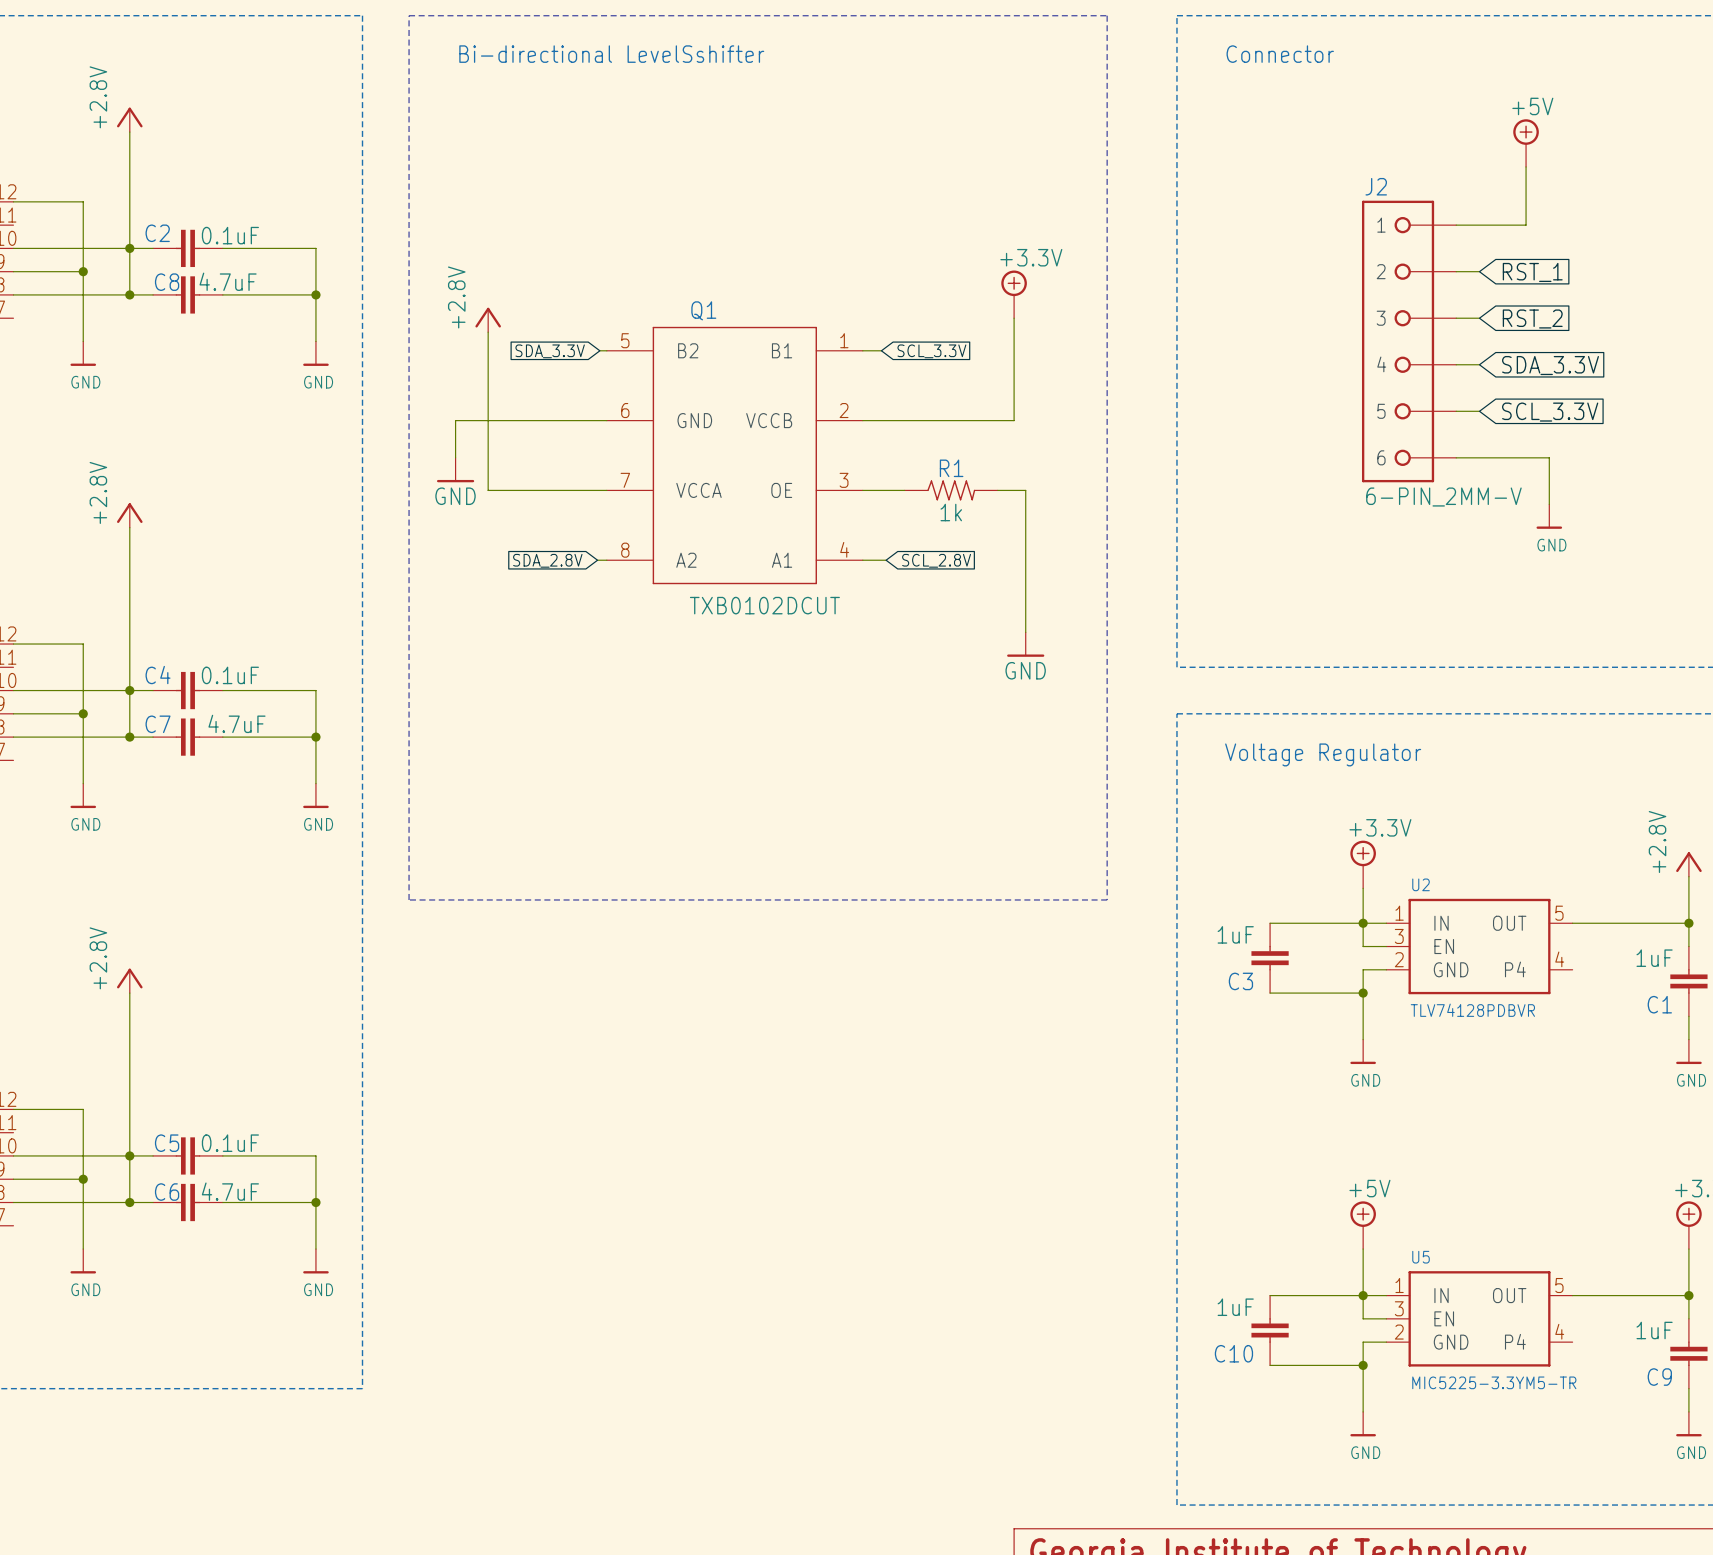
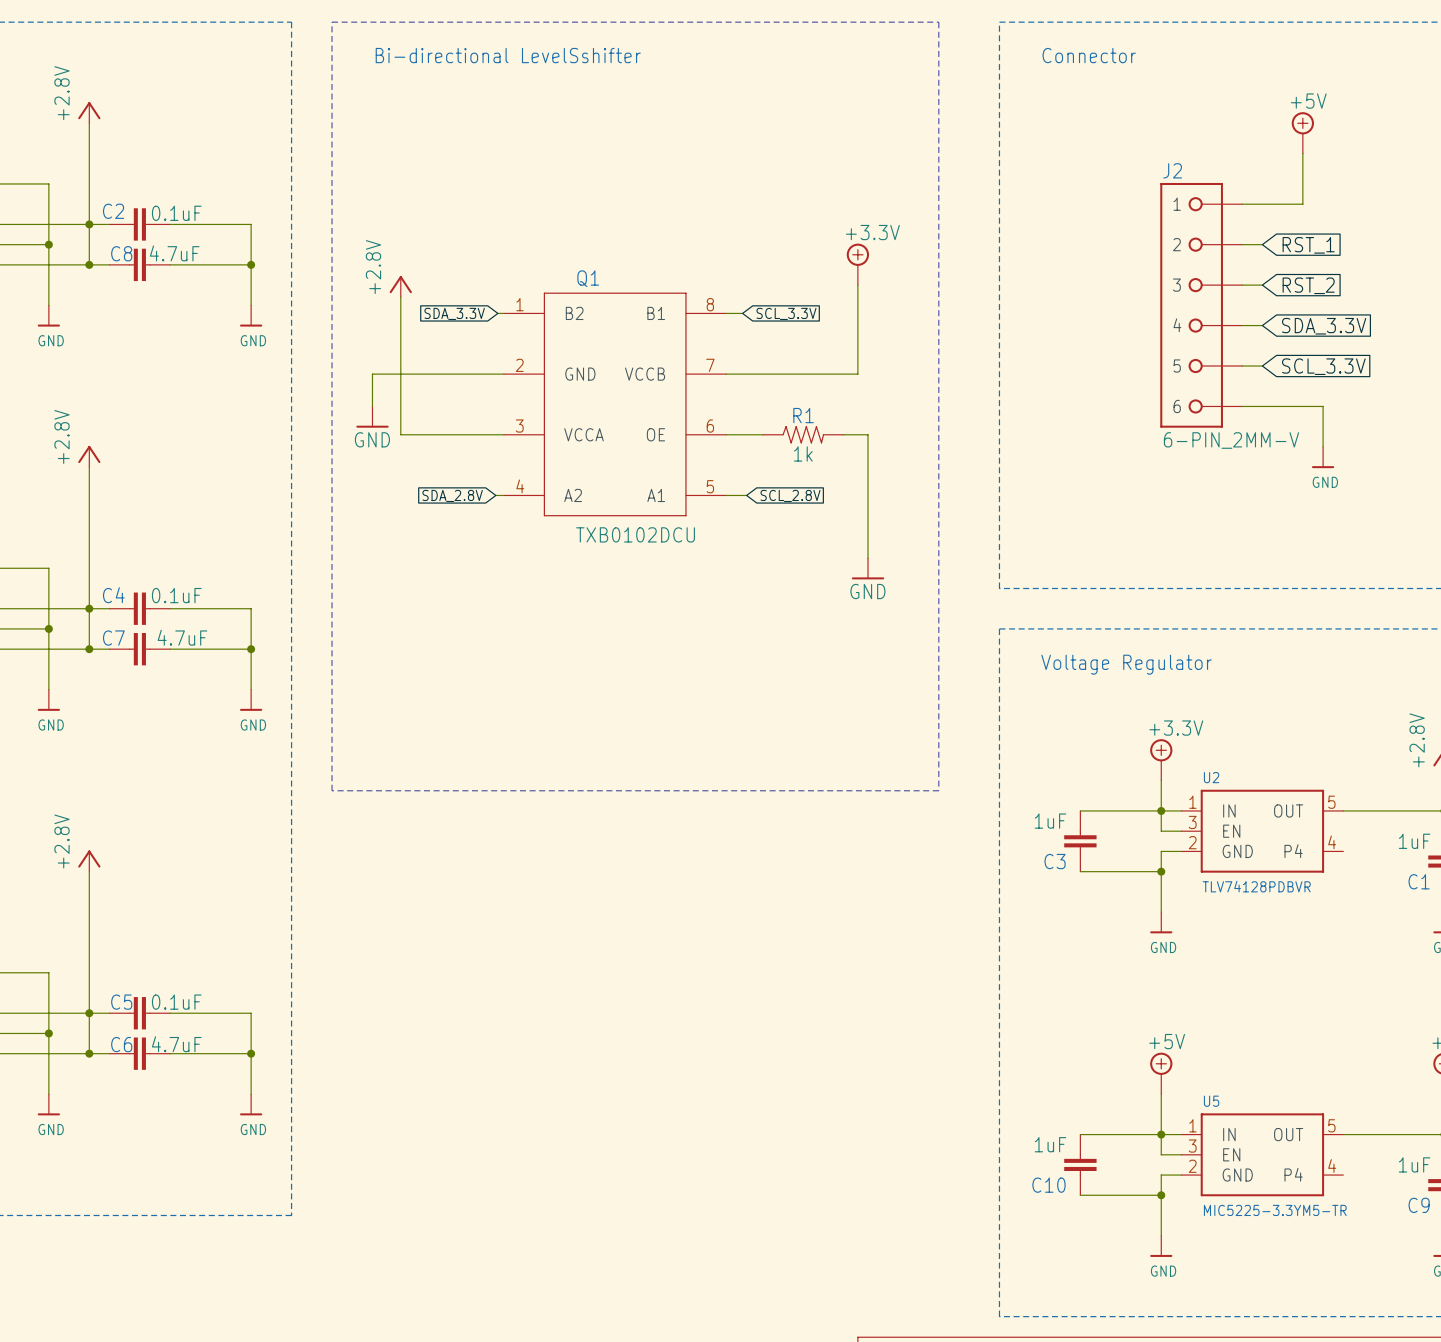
Q1 pin number: 5 (625, 340) -> 1 (520, 304)
Q1 pin number: 1 (844, 340) -> 8 (710, 304)
Q1 pin number: 6 (625, 410) -> 2 (519, 365)
Q1 pin number: 2 (844, 410) -> 7 (710, 365)
Q1 pin number: 7 (625, 480) -> 3 (519, 426)
Q1 pin number: 3 (844, 480) -> 6 (710, 426)
Q1 pin number: 4 (844, 549) -> 5 (710, 486)
Q1 pin number: 8 (625, 550) -> 4 (520, 486)
Q1 value: TXB0102DCUT (764, 605) -> TXB0102DCU (635, 534)

